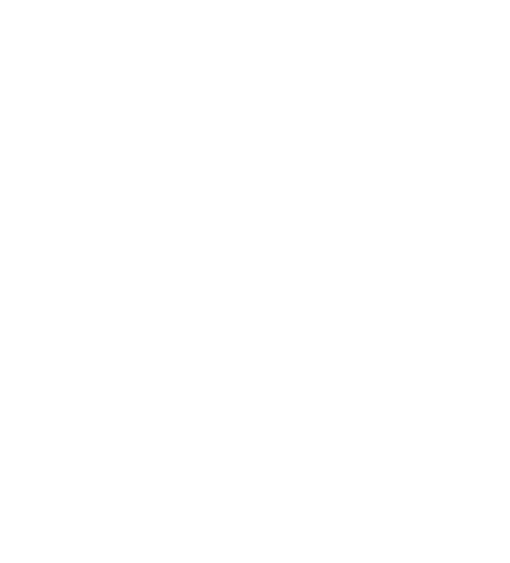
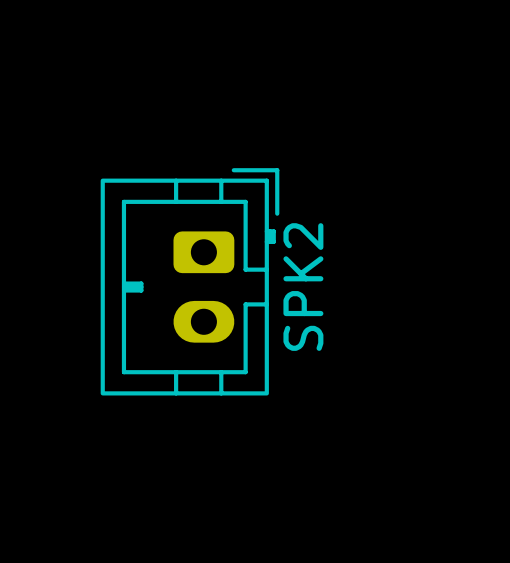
SPK2: none -> (190, 281)

